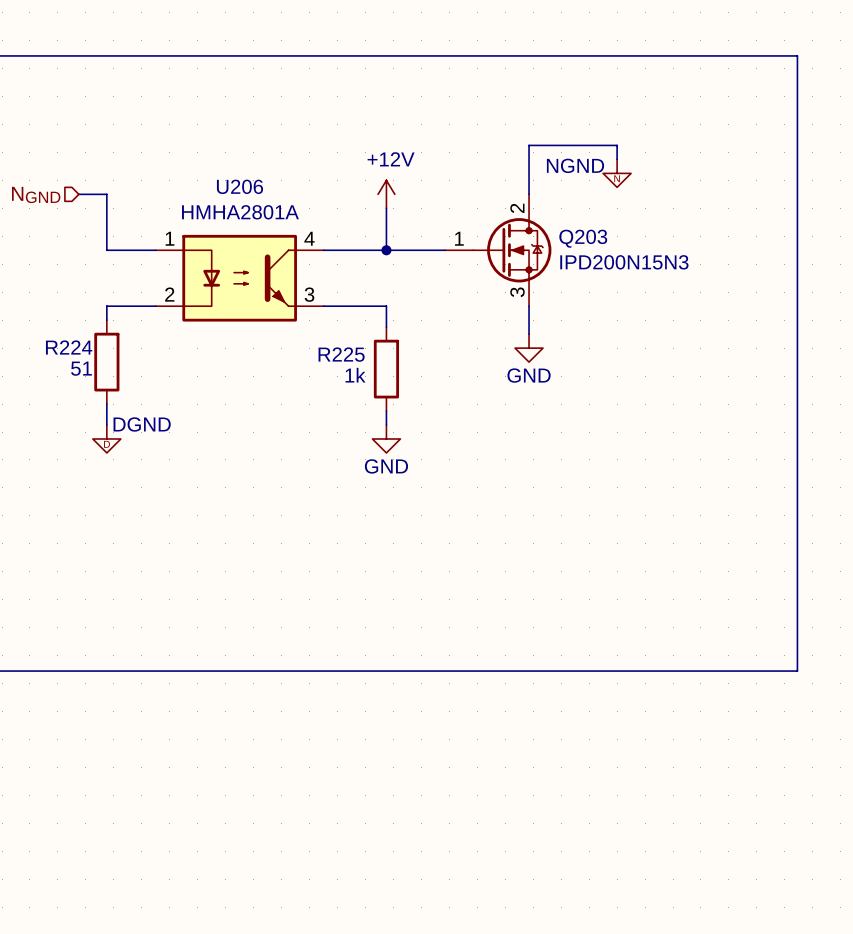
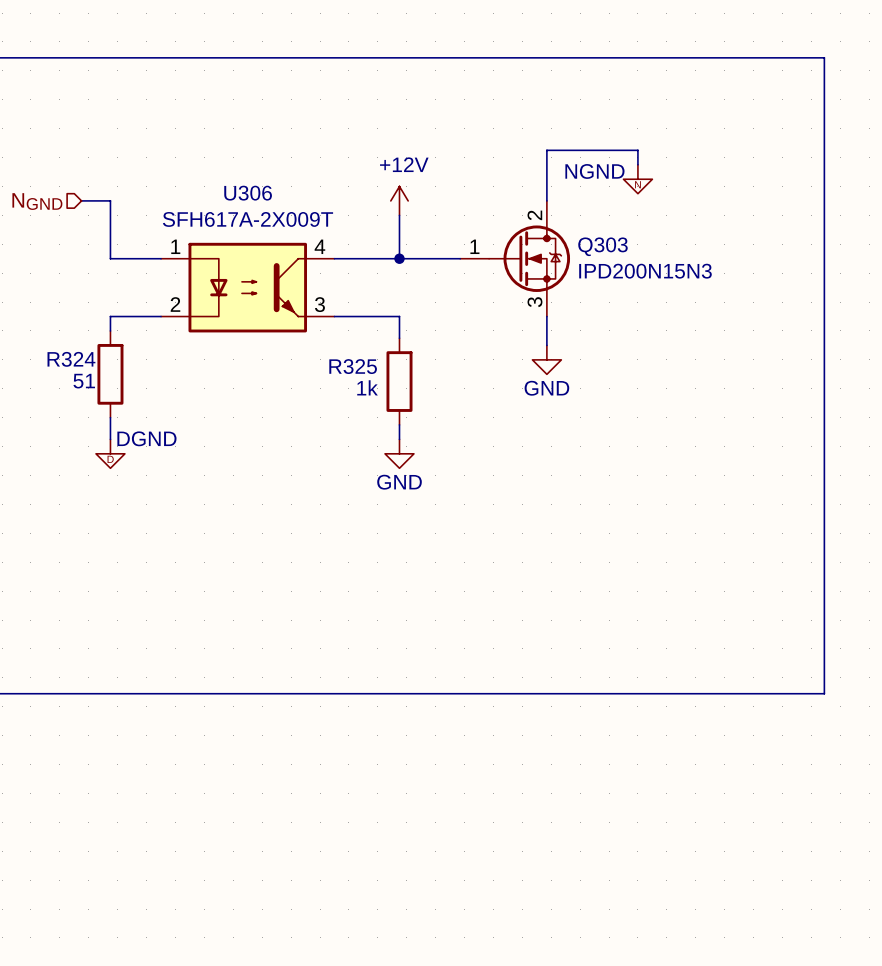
U206 name: U206 (239, 186) -> U306 (248, 193)
U206 value: HMHA2801A (240, 212) -> SFH617A-2X009T (247, 219)
Q203 name: Q203 (583, 238) -> Q303 (602, 246)
R224 name: R224 (69, 347) -> R324 (71, 359)
R225 name: R225 (341, 354) -> R325 (353, 366)

